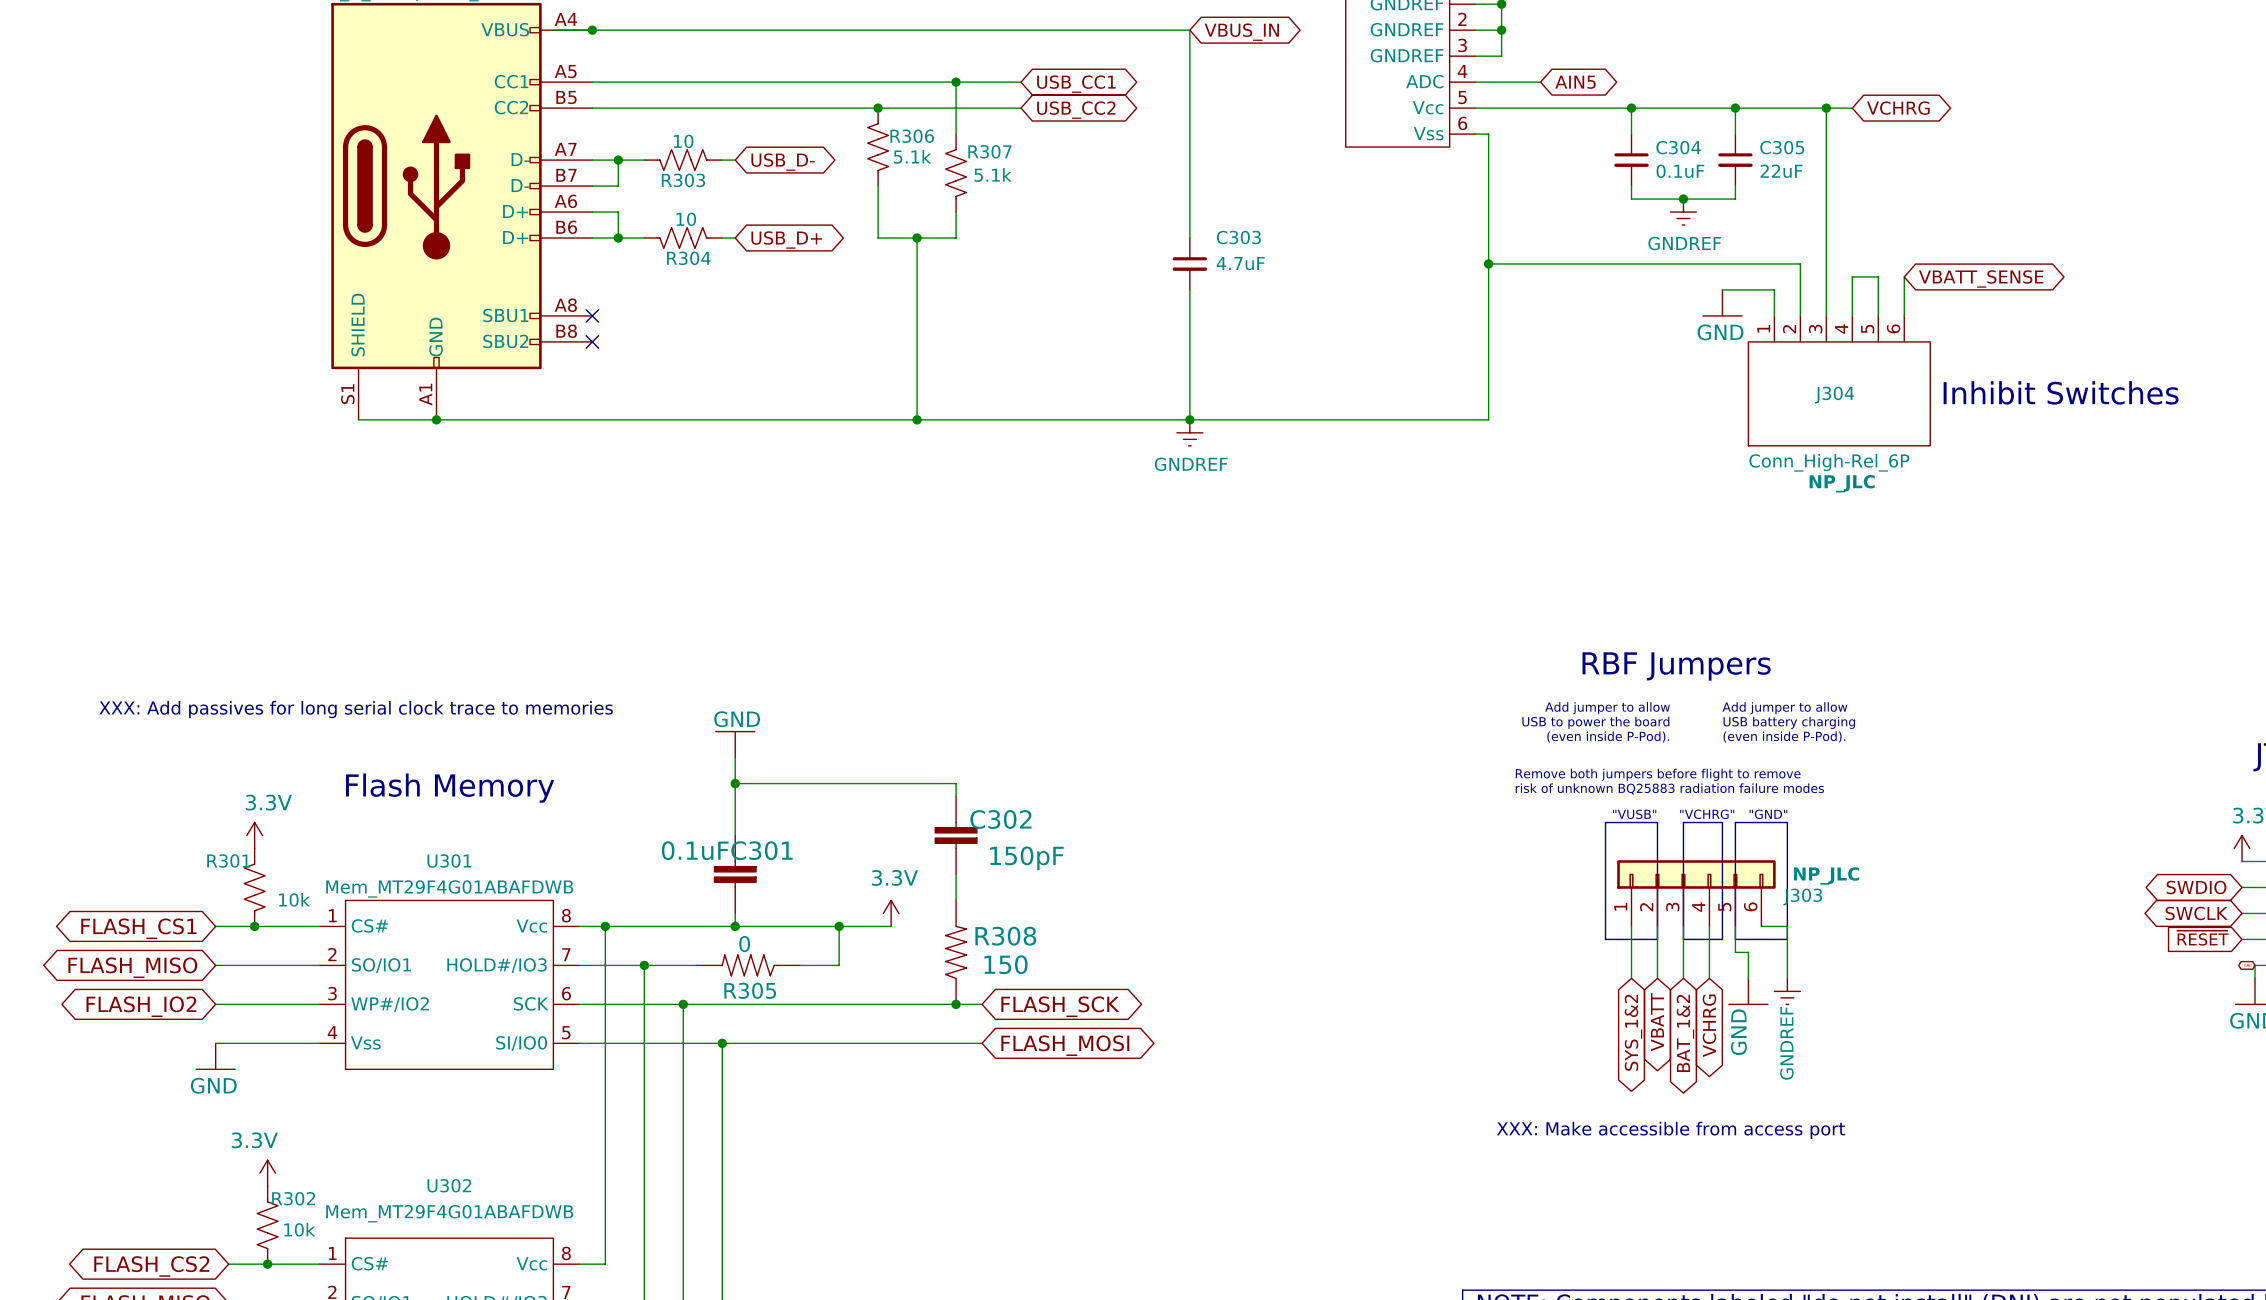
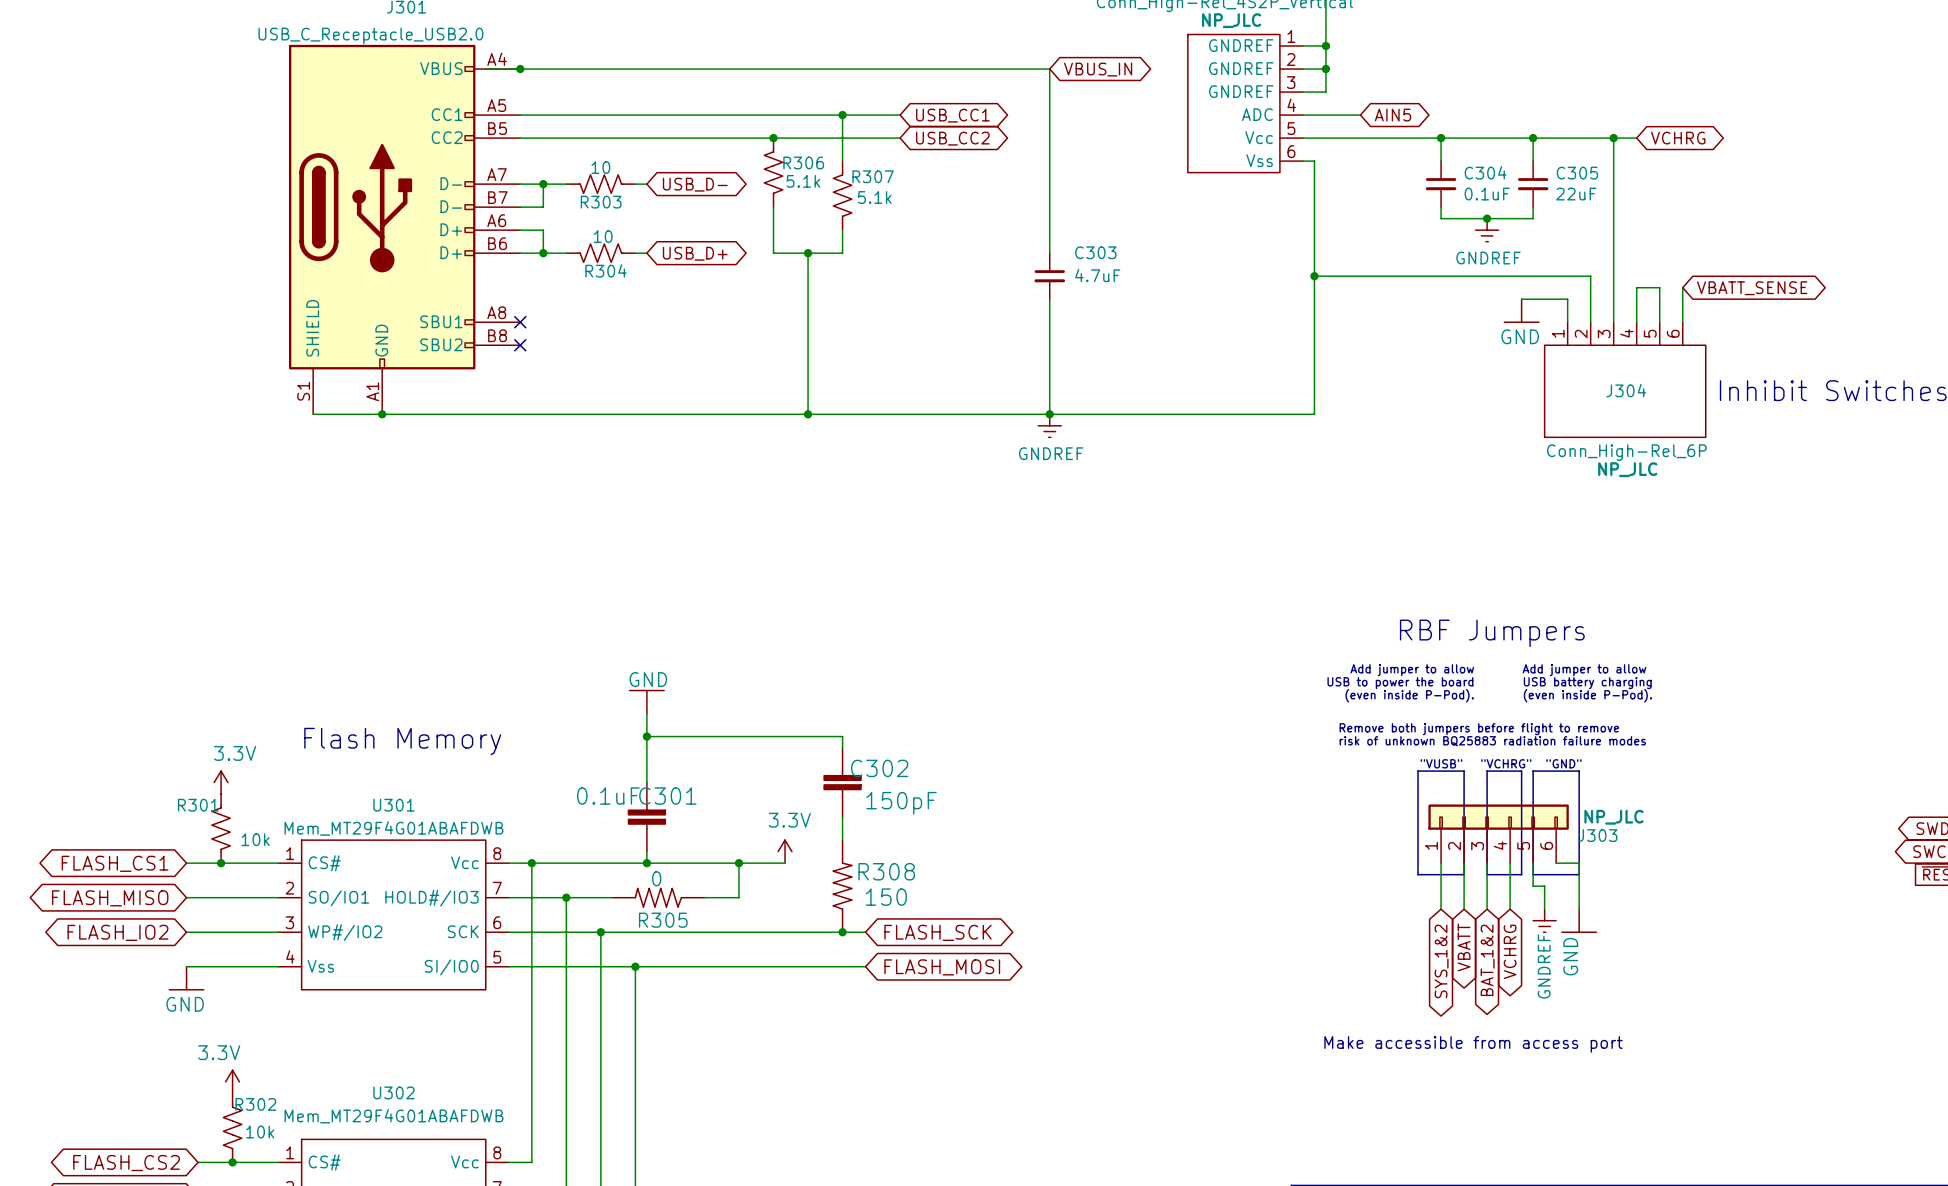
text: XXX: Add passives for long serial clock trace to memories (356, 709) -> none
power symbol: GND (1748, 991) -> GNDREF (1544, 920)
power symbol: GNDREF (1787, 991) -> GND (1579, 920)
text: XXX: Make accessible from access port (1671, 1130) -> Make accessible from access port (1473, 1044)

